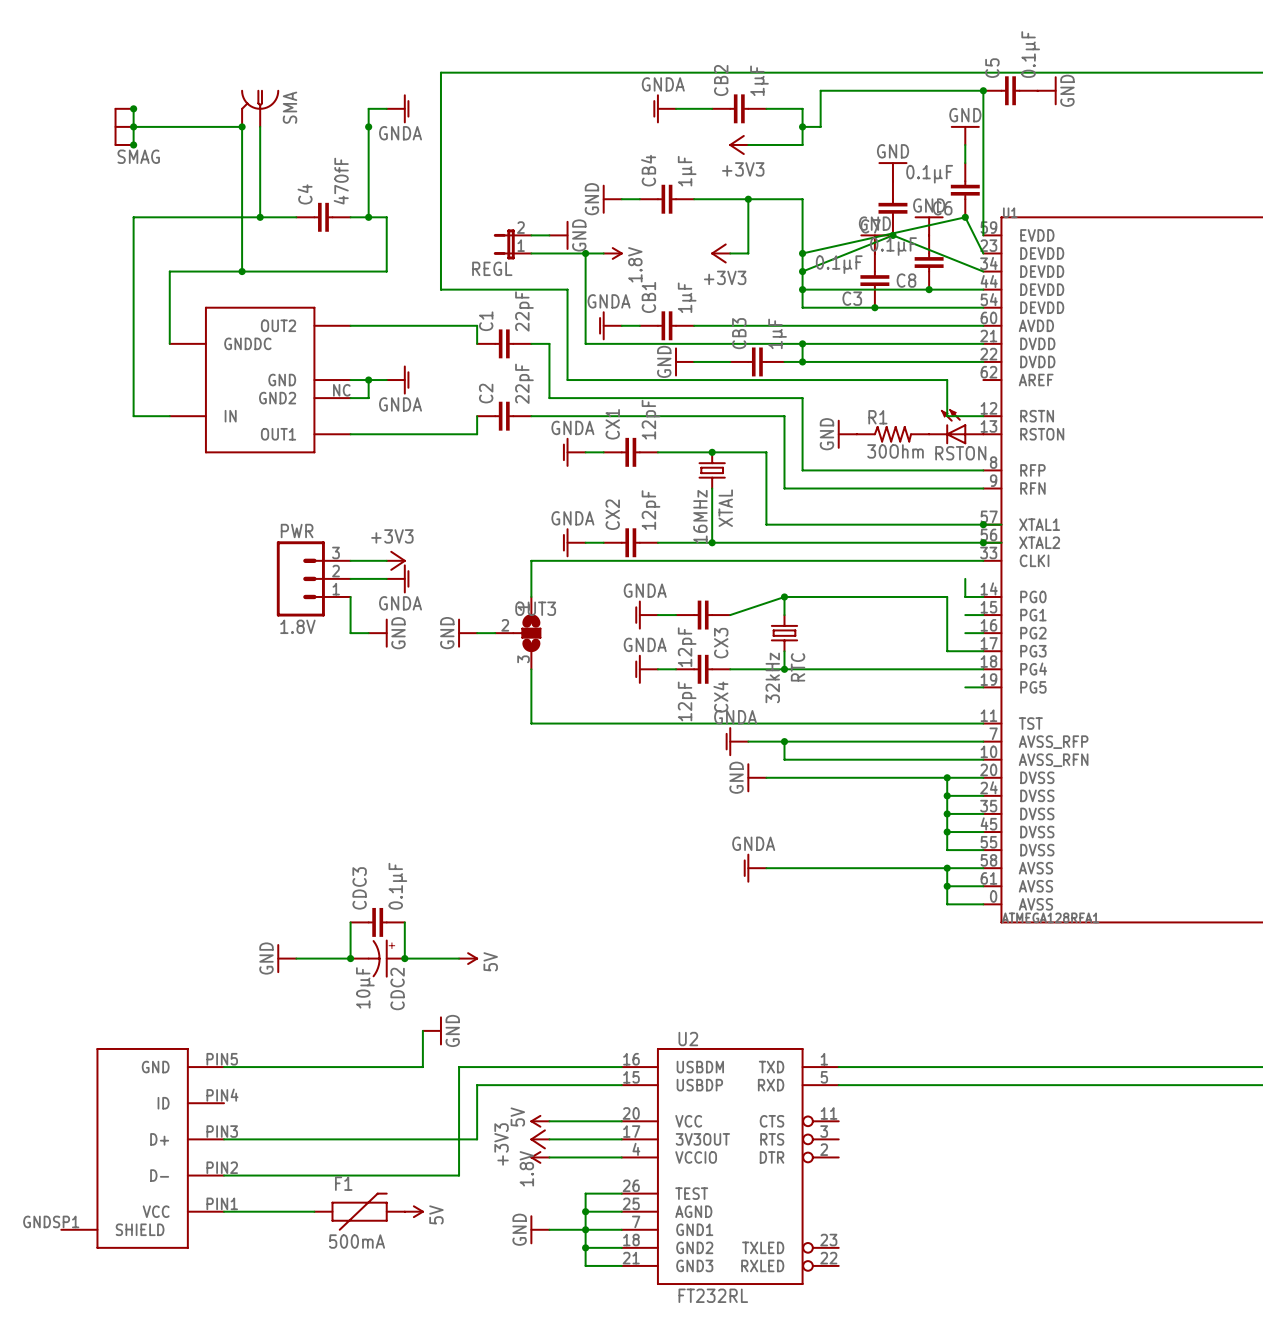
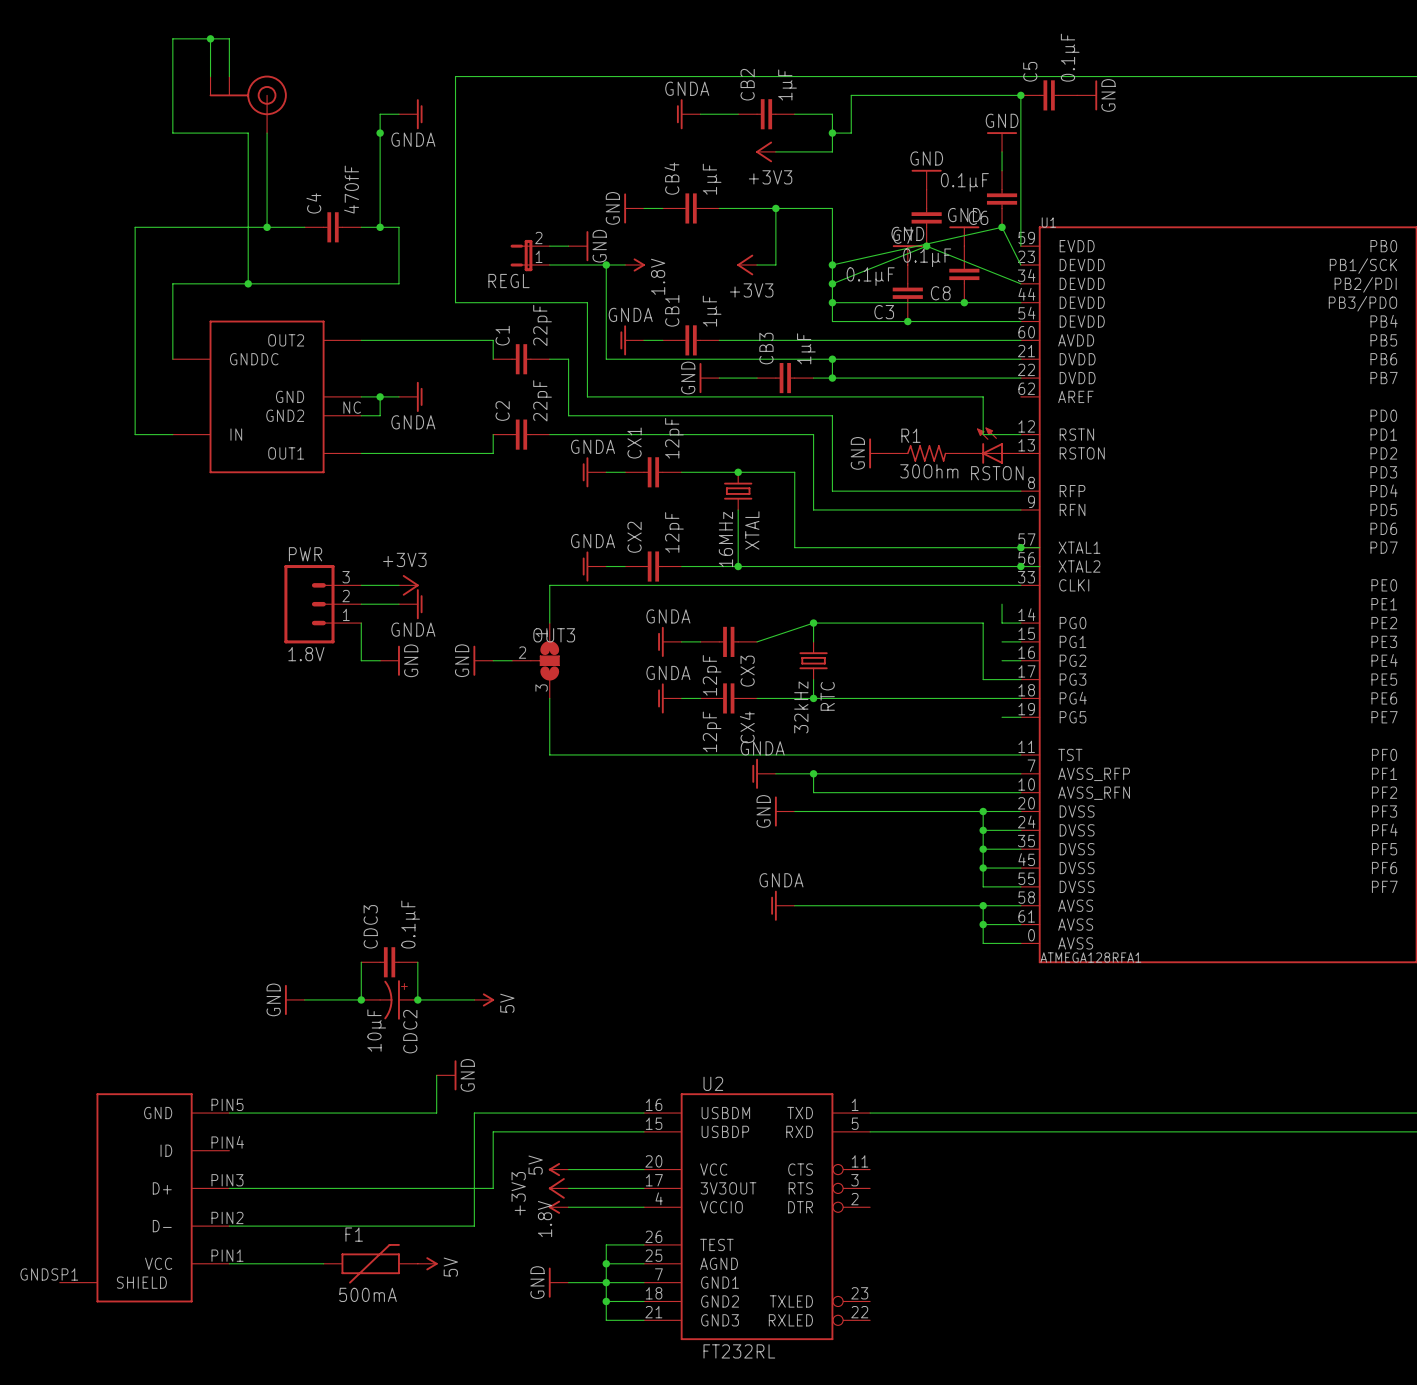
junction: none -> (210, 38)
part: none -> (248, 104)
wire: (133, 108) (133, 144) -> (210, 38) (210, 76)
junction: (133, 108) -> none
SMA: (260, 108) -> none
SMAG: (124, 126) -> none
wire: (133, 126) (169, 126) -> (229, 76) (229, 38) (172, 38) (172, 133)
junction: (133, 126) -> none
junction: (242, 126) -> none
junction: (133, 144) -> none

